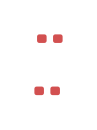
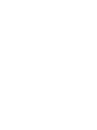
part: (49, 38) -> none
part: (47, 90) -> none

